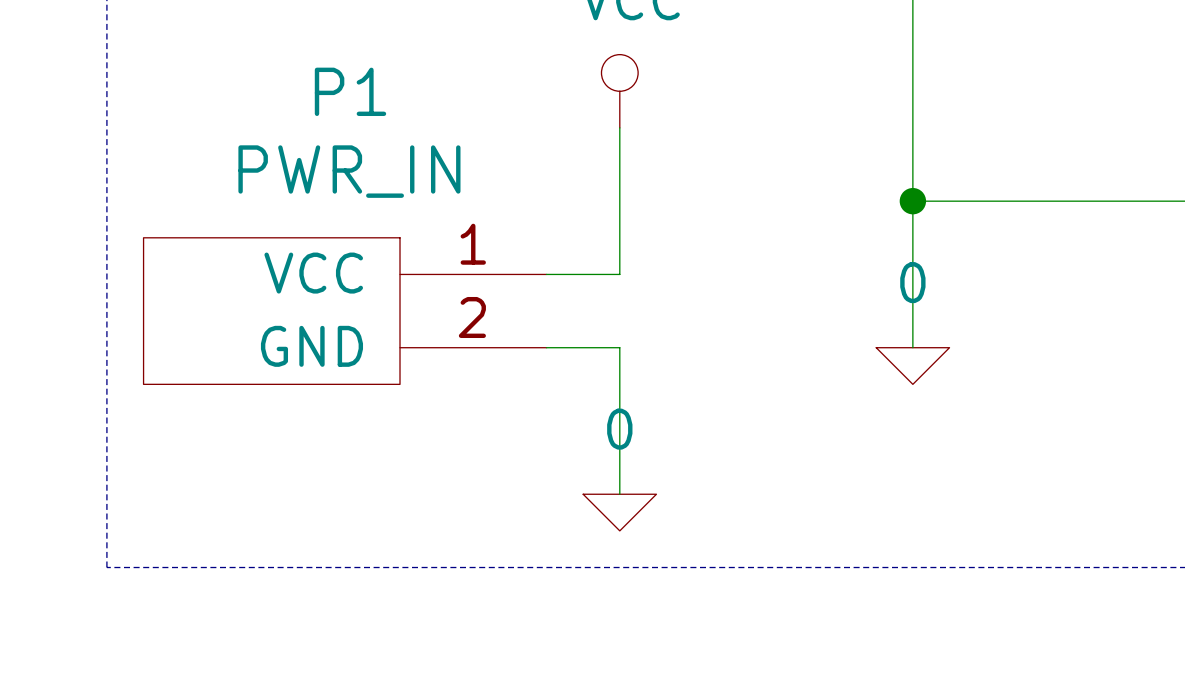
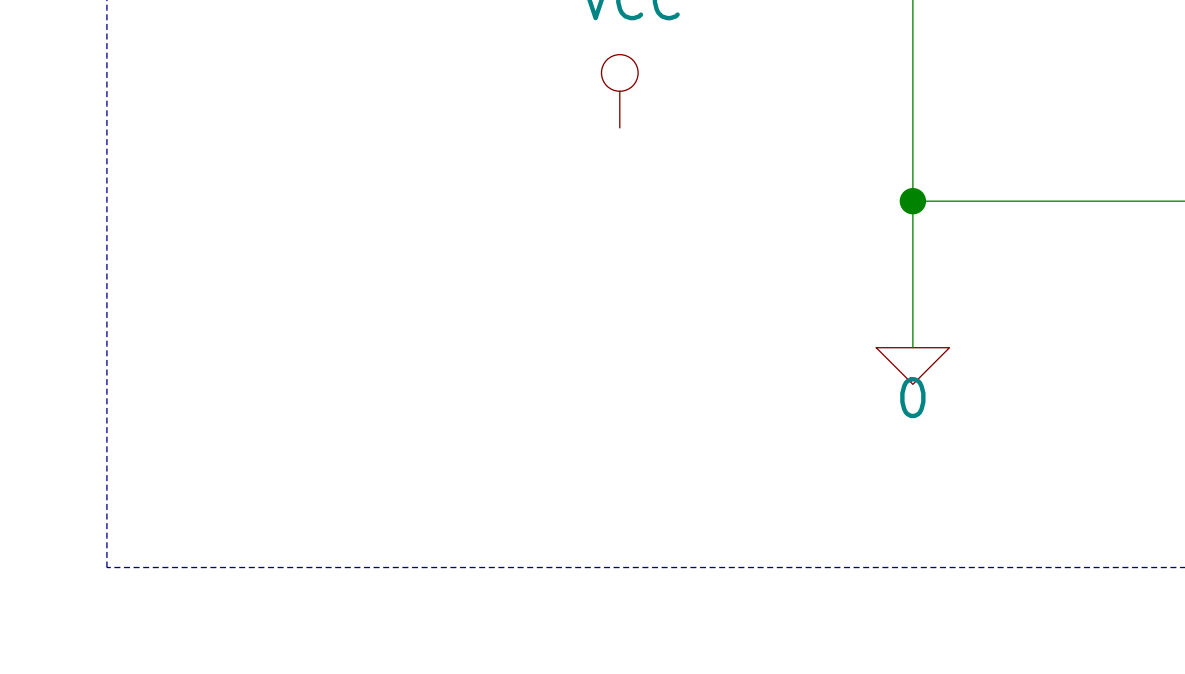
wire: (619, 127) (619, 274) (546, 274) -> none
power symbol text position: 0 (912, 282) -> 0 (912, 397)
P1: PWR_IN (345, 311) -> none
wire: (546, 347) (619, 347) (619, 494) -> none
power symbol: 0 (619, 512) -> none

